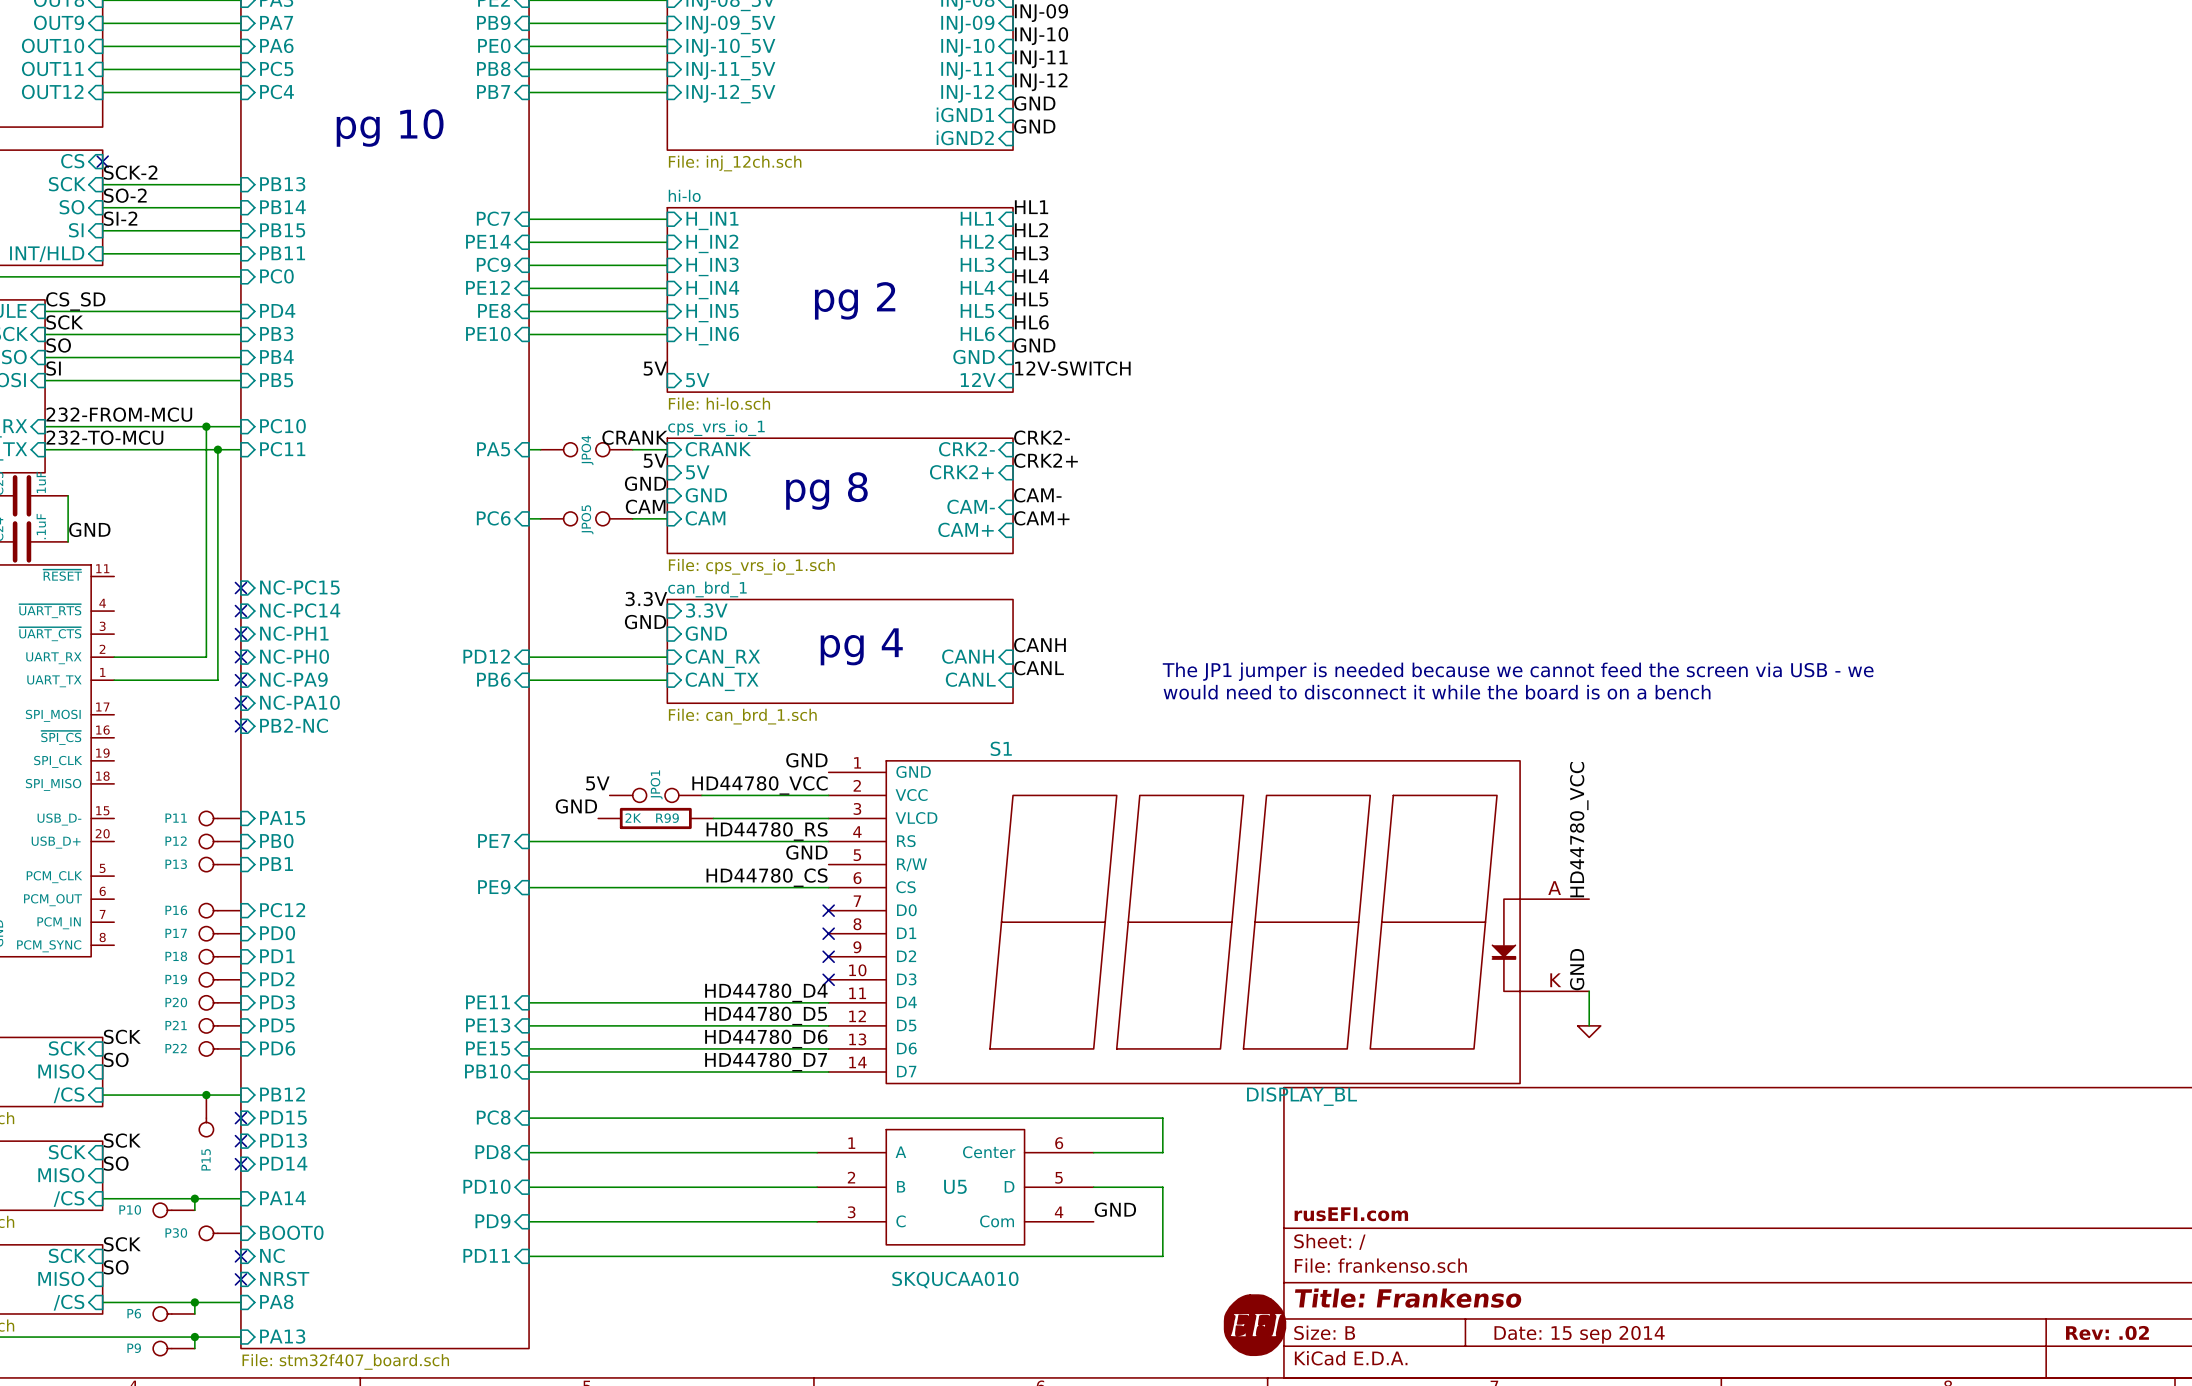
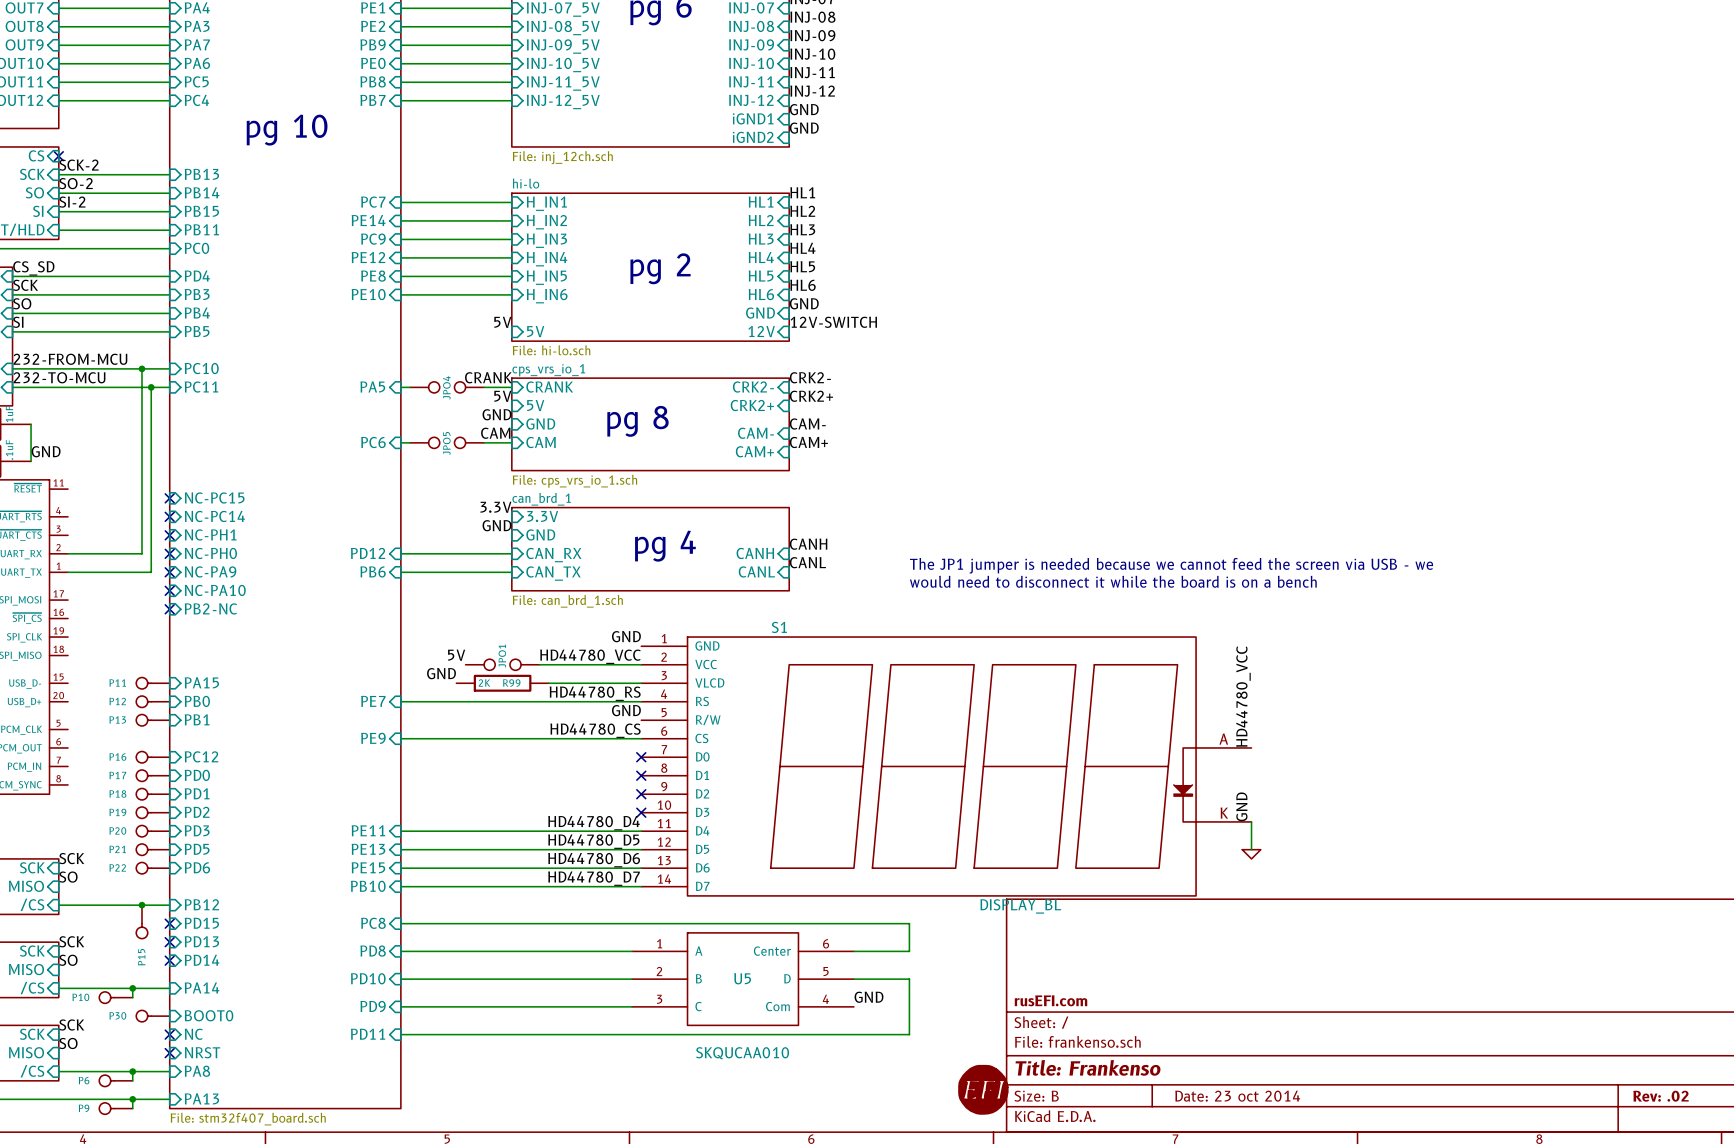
title block: Date: 15 sep 2014 (1579, 1334) -> Date: 23 oct 2014 (1237, 1096)

